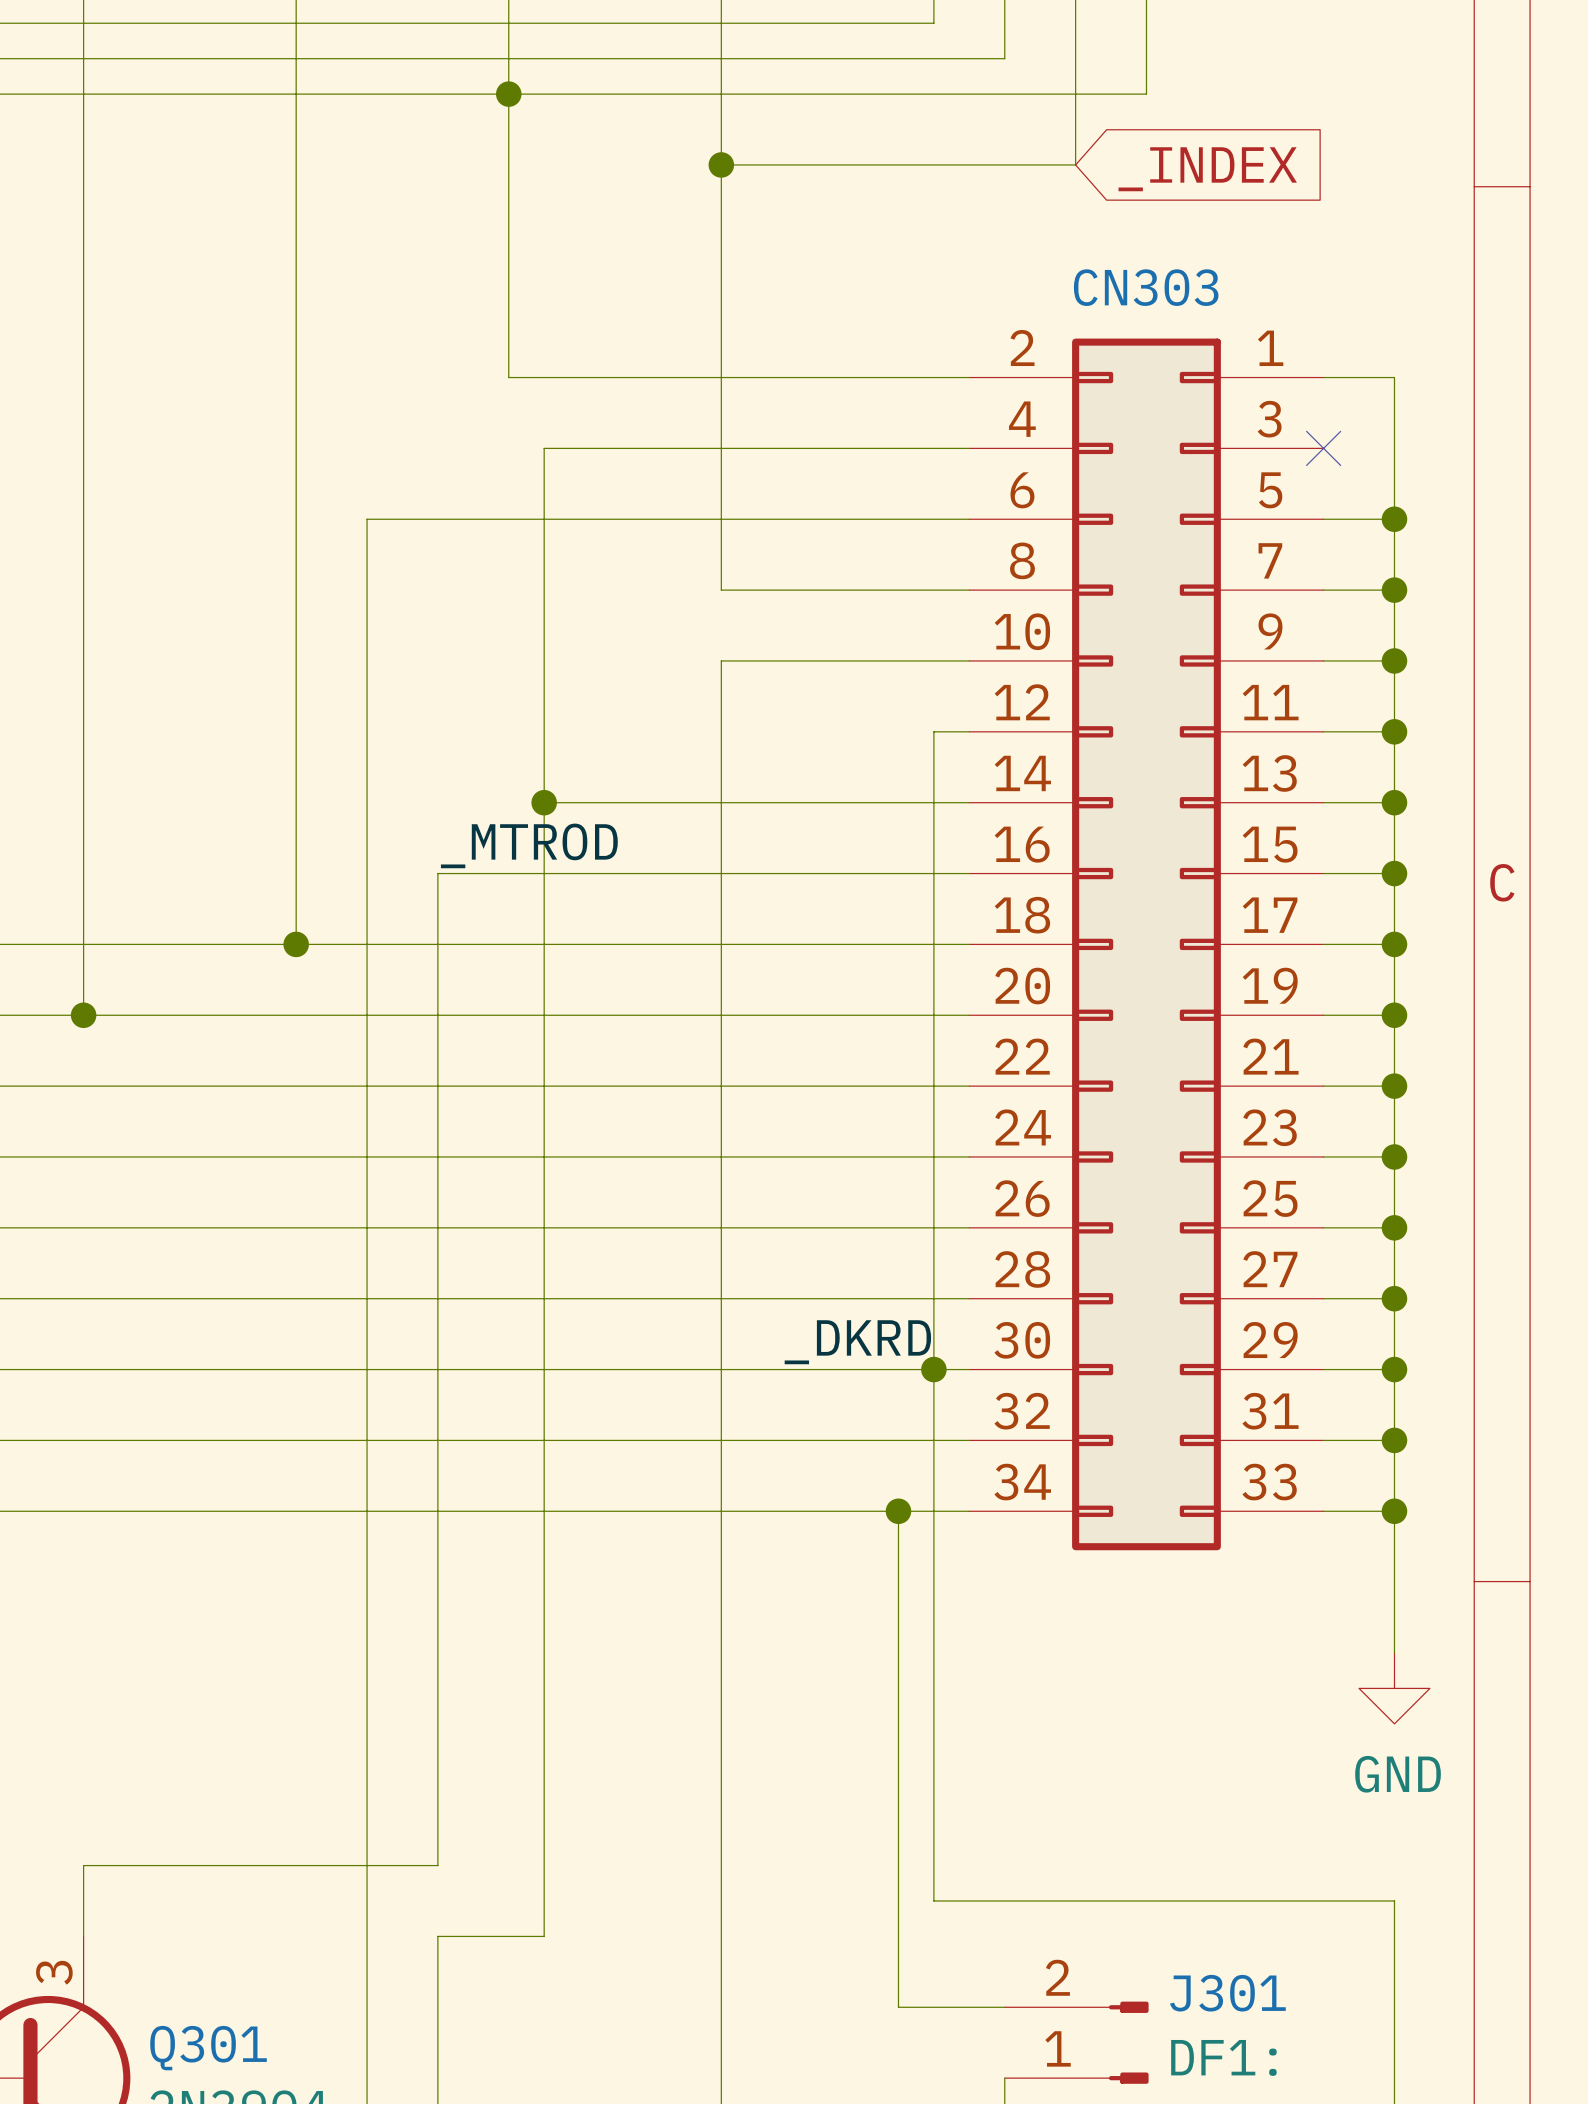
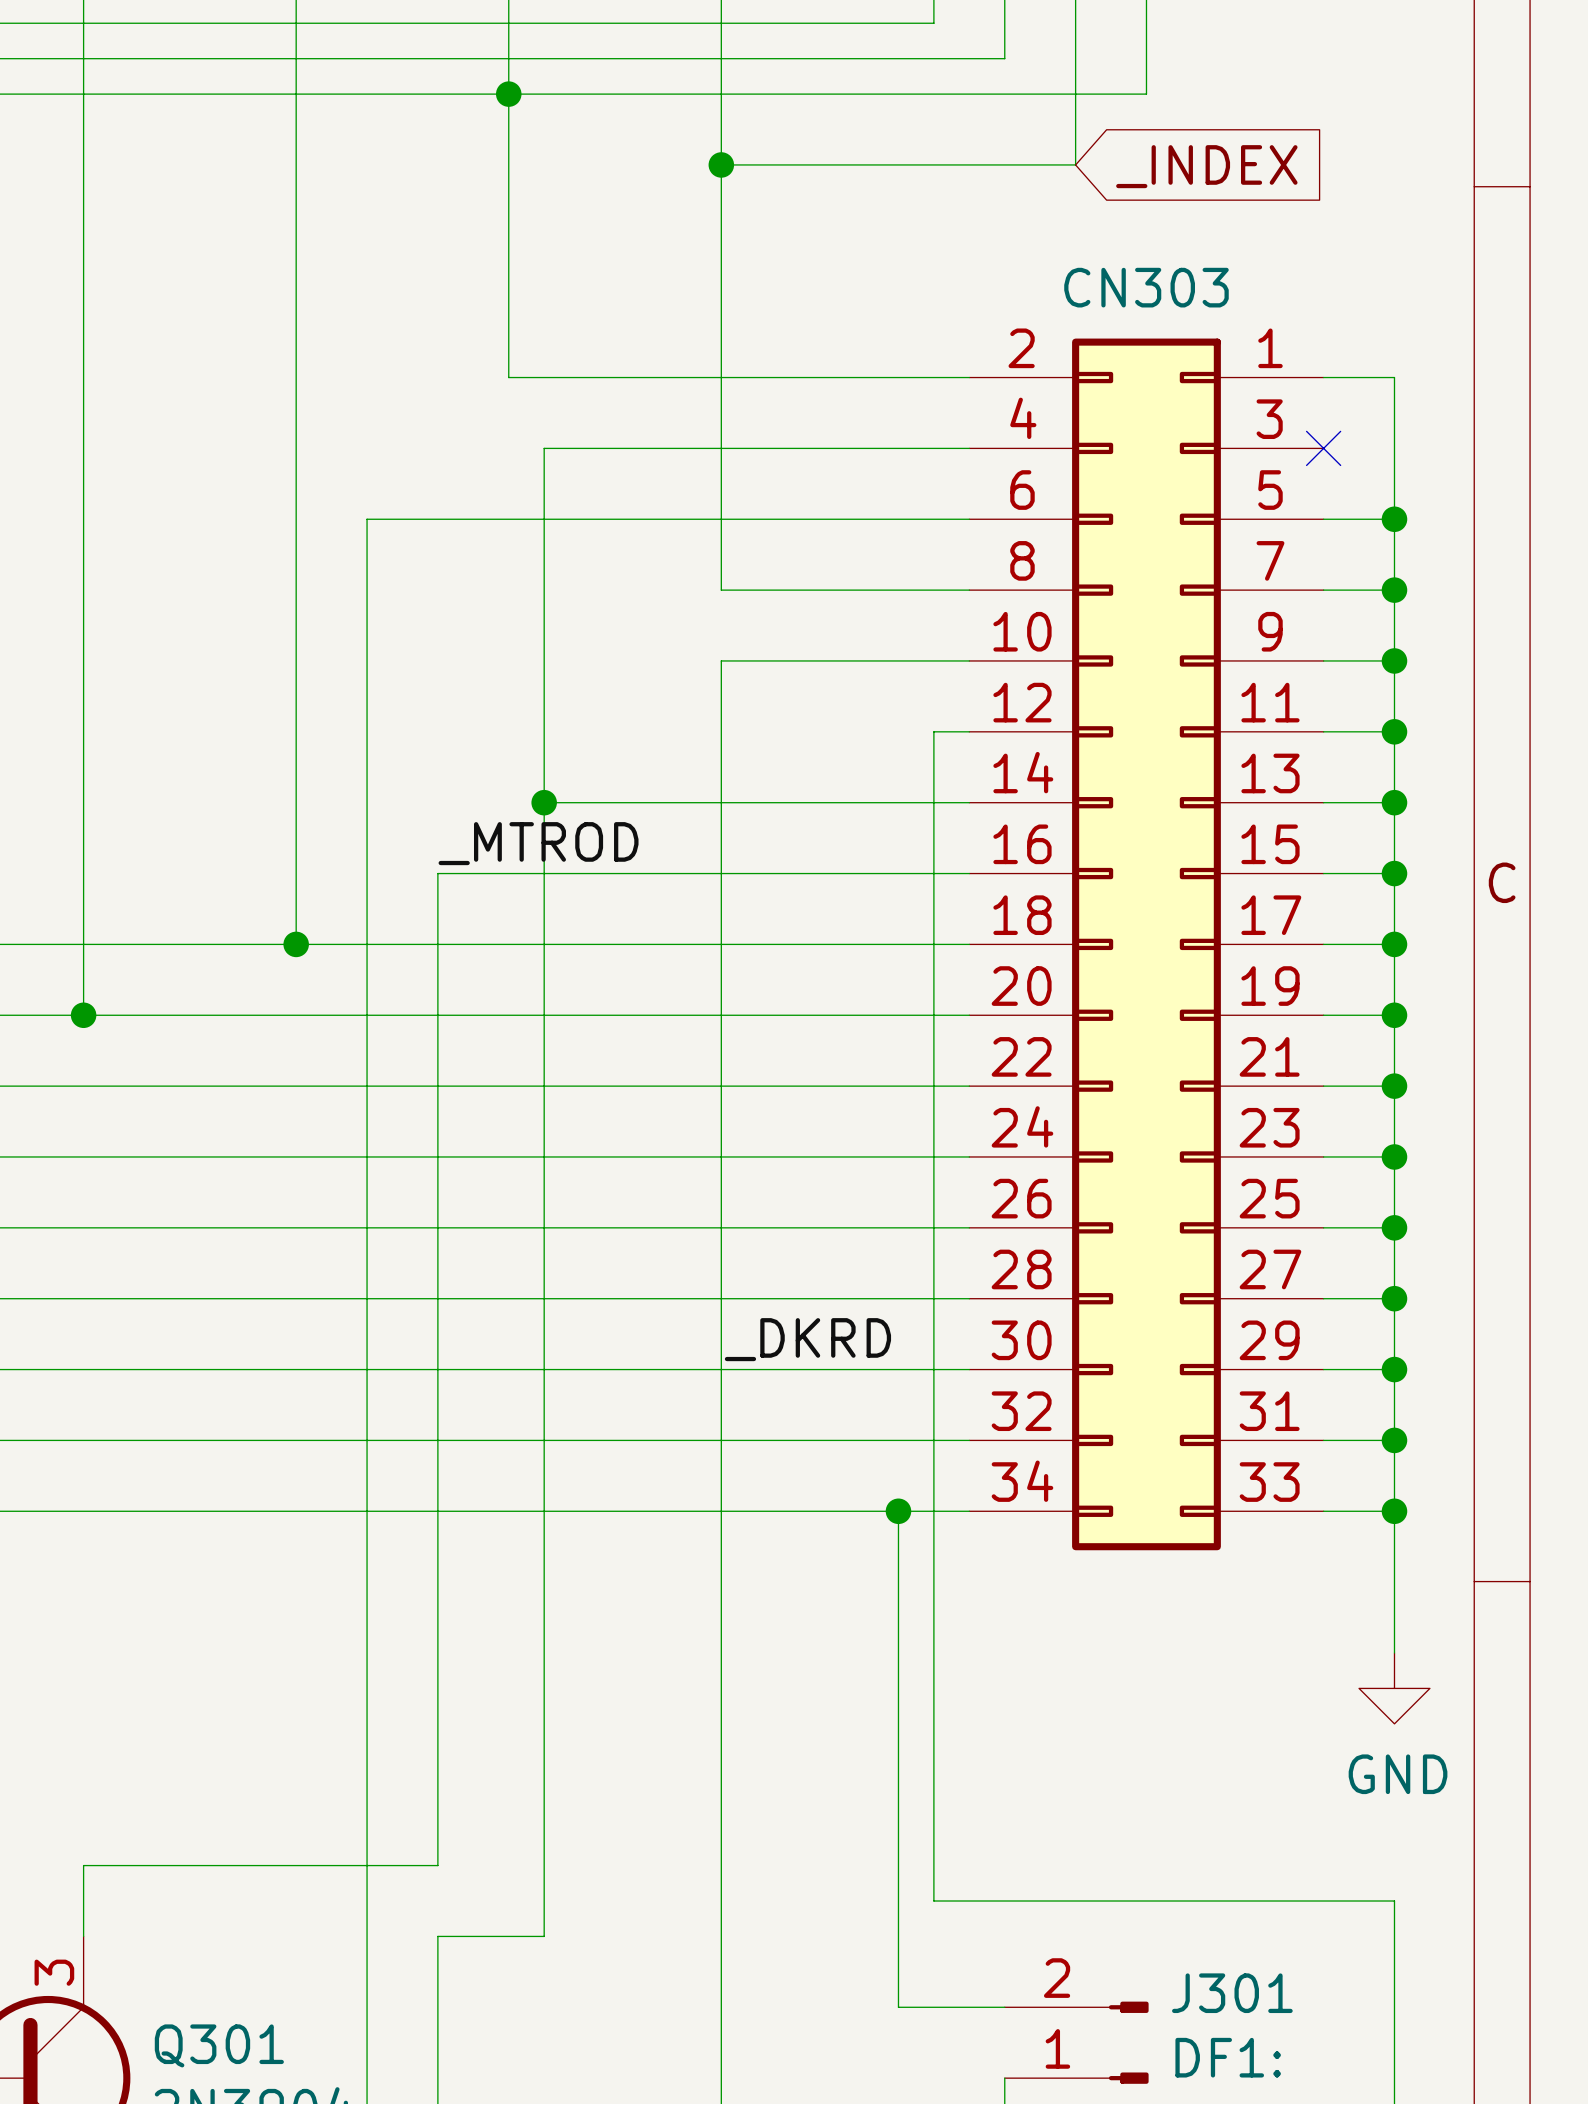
label position: _DKRD (857, 1342) -> _DKRD (807, 1339)
junction: (933, 1369) -> none

